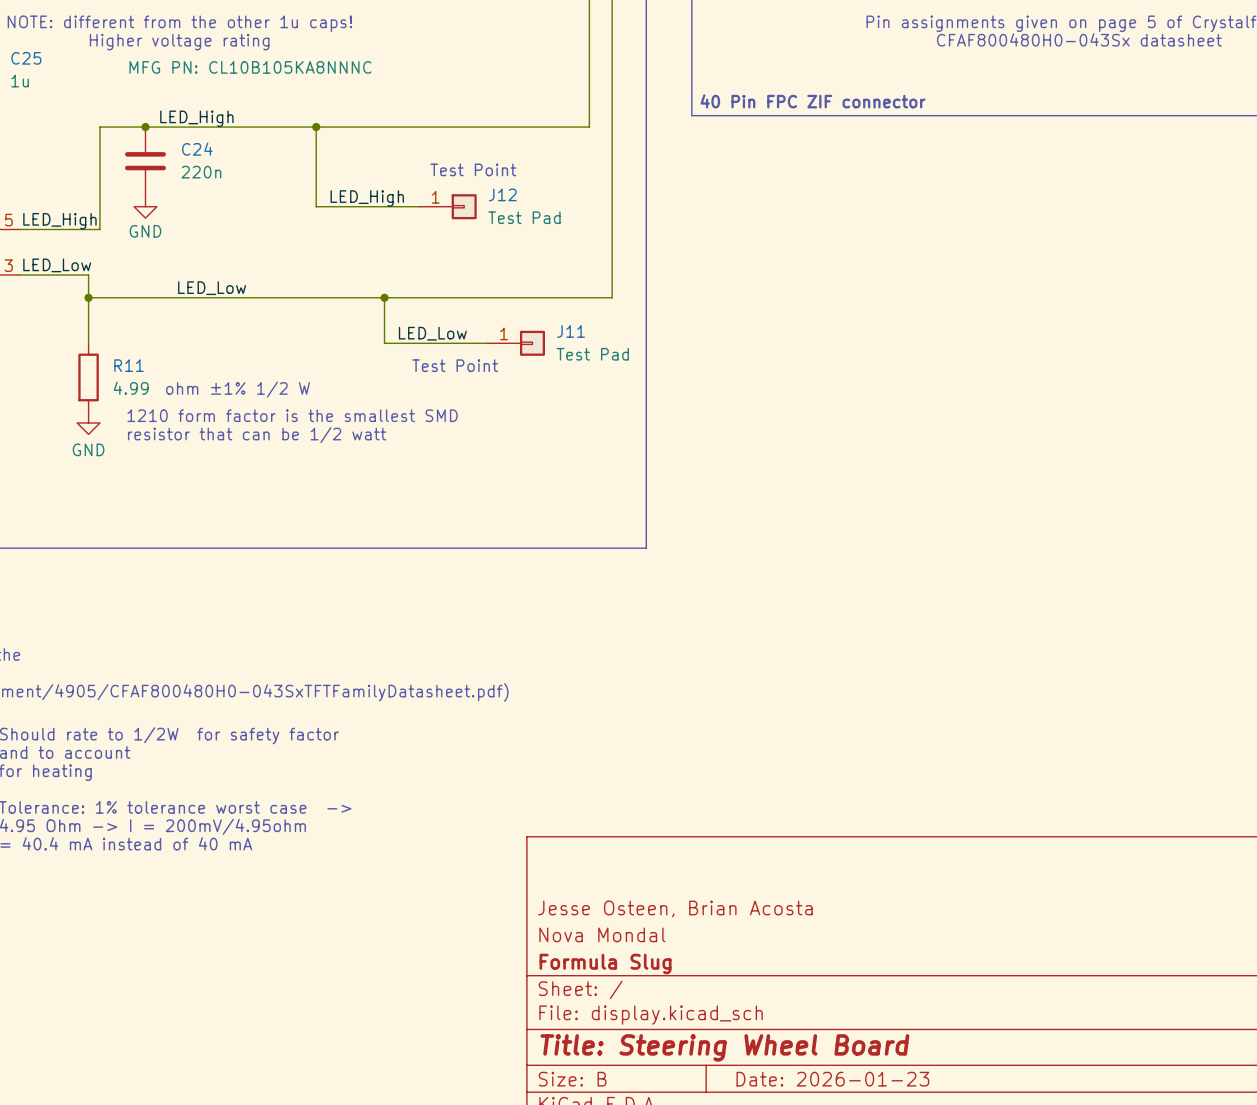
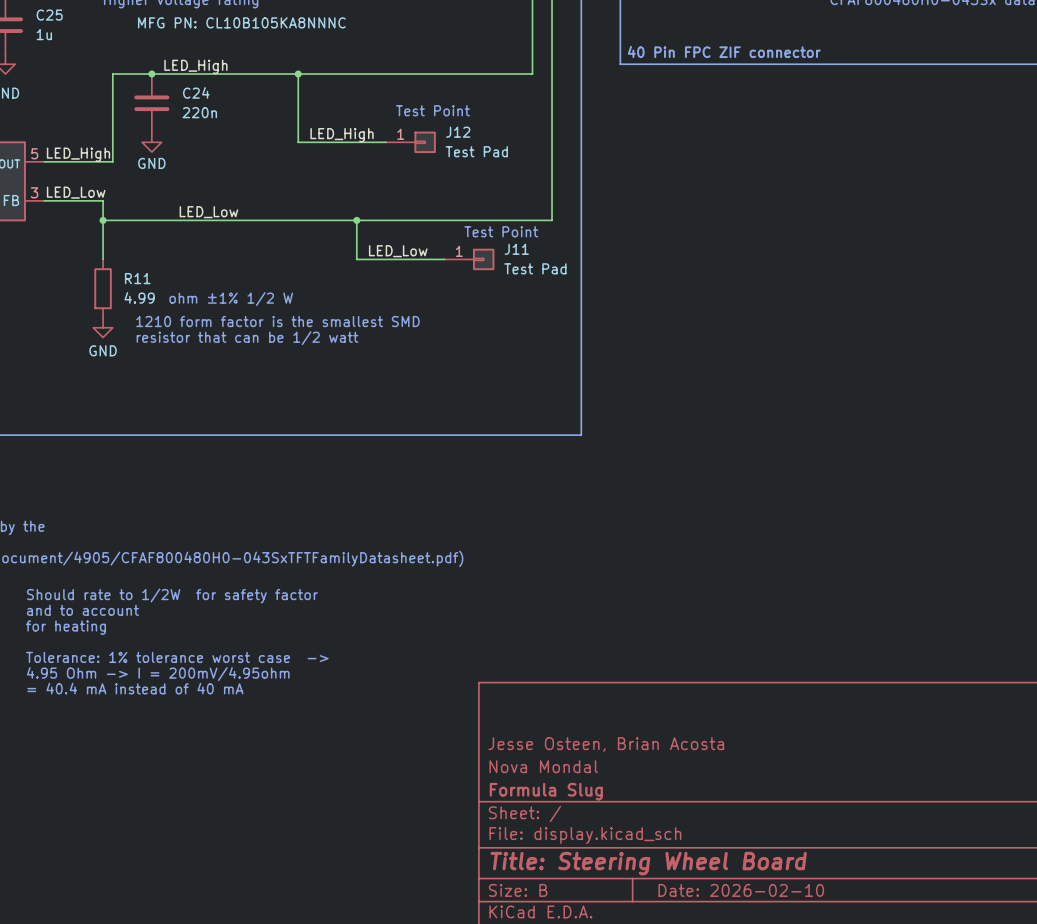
text position: Test Point (455, 365) -> Test Point (501, 231)
title block: Date: 2026-01-23 (832, 1079) -> Date: 2026-02-10 (741, 890)

